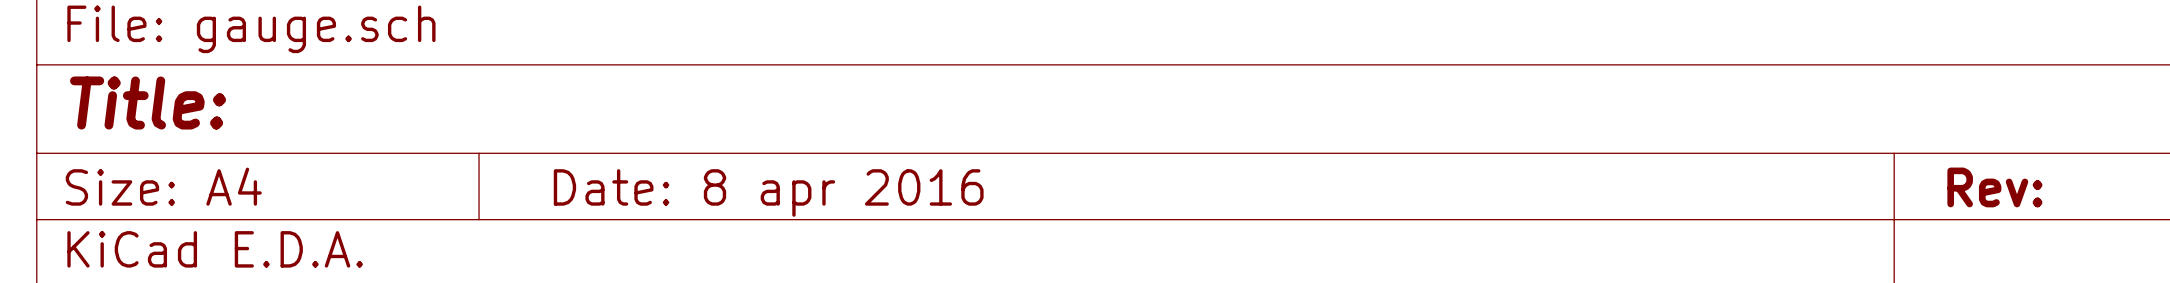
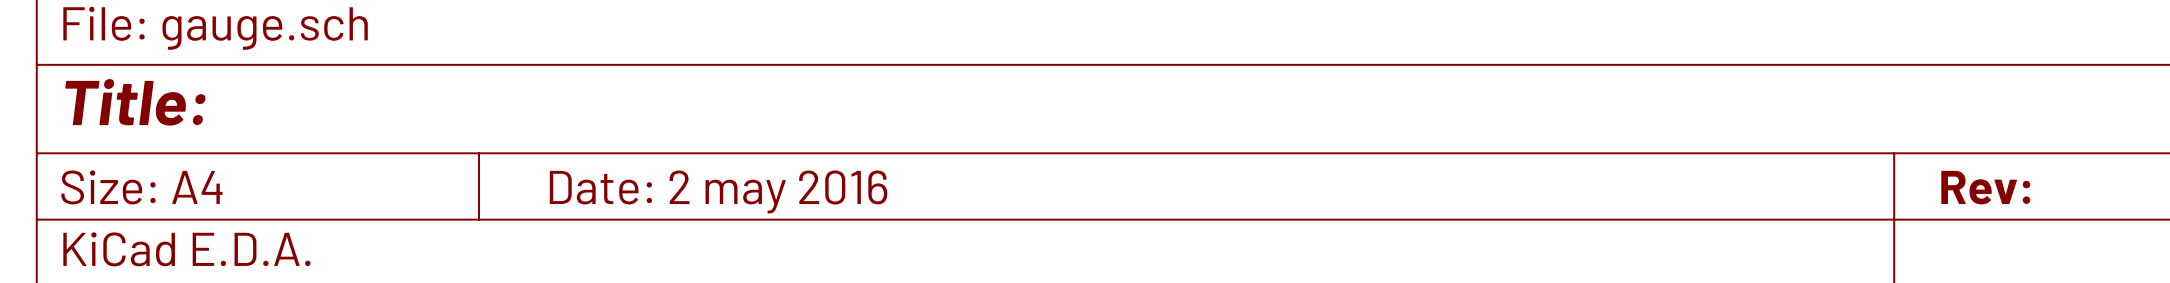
title block: Date: 8 apr 2016 (768, 192) -> Date: 2 may 2016 (718, 191)

